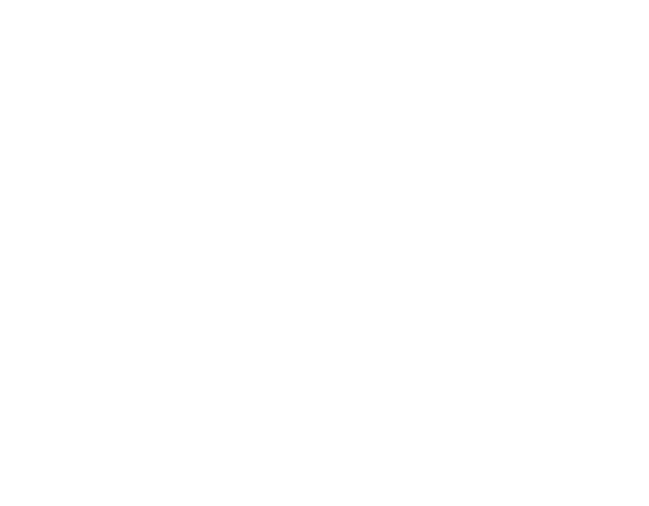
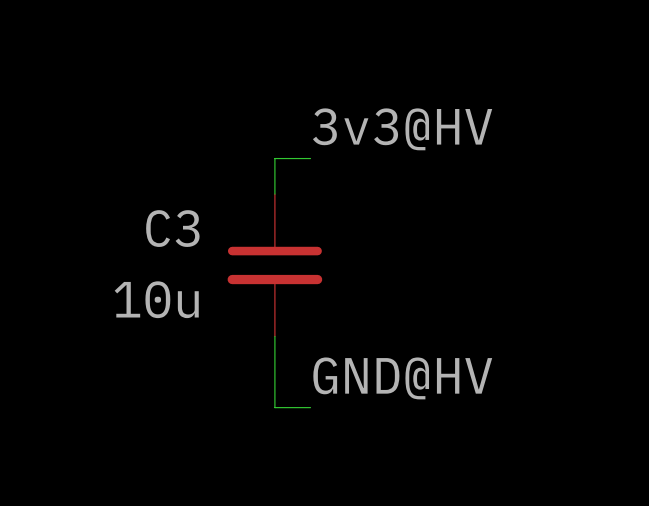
label: none -> 3v3@HV (402, 129)
wire: none -> (310, 158) (274, 158) (274, 194)
C3: none -> 10u (274, 265)
wire: none -> (274, 336) (274, 407) (310, 407)
label: none -> GND@HV (402, 378)

